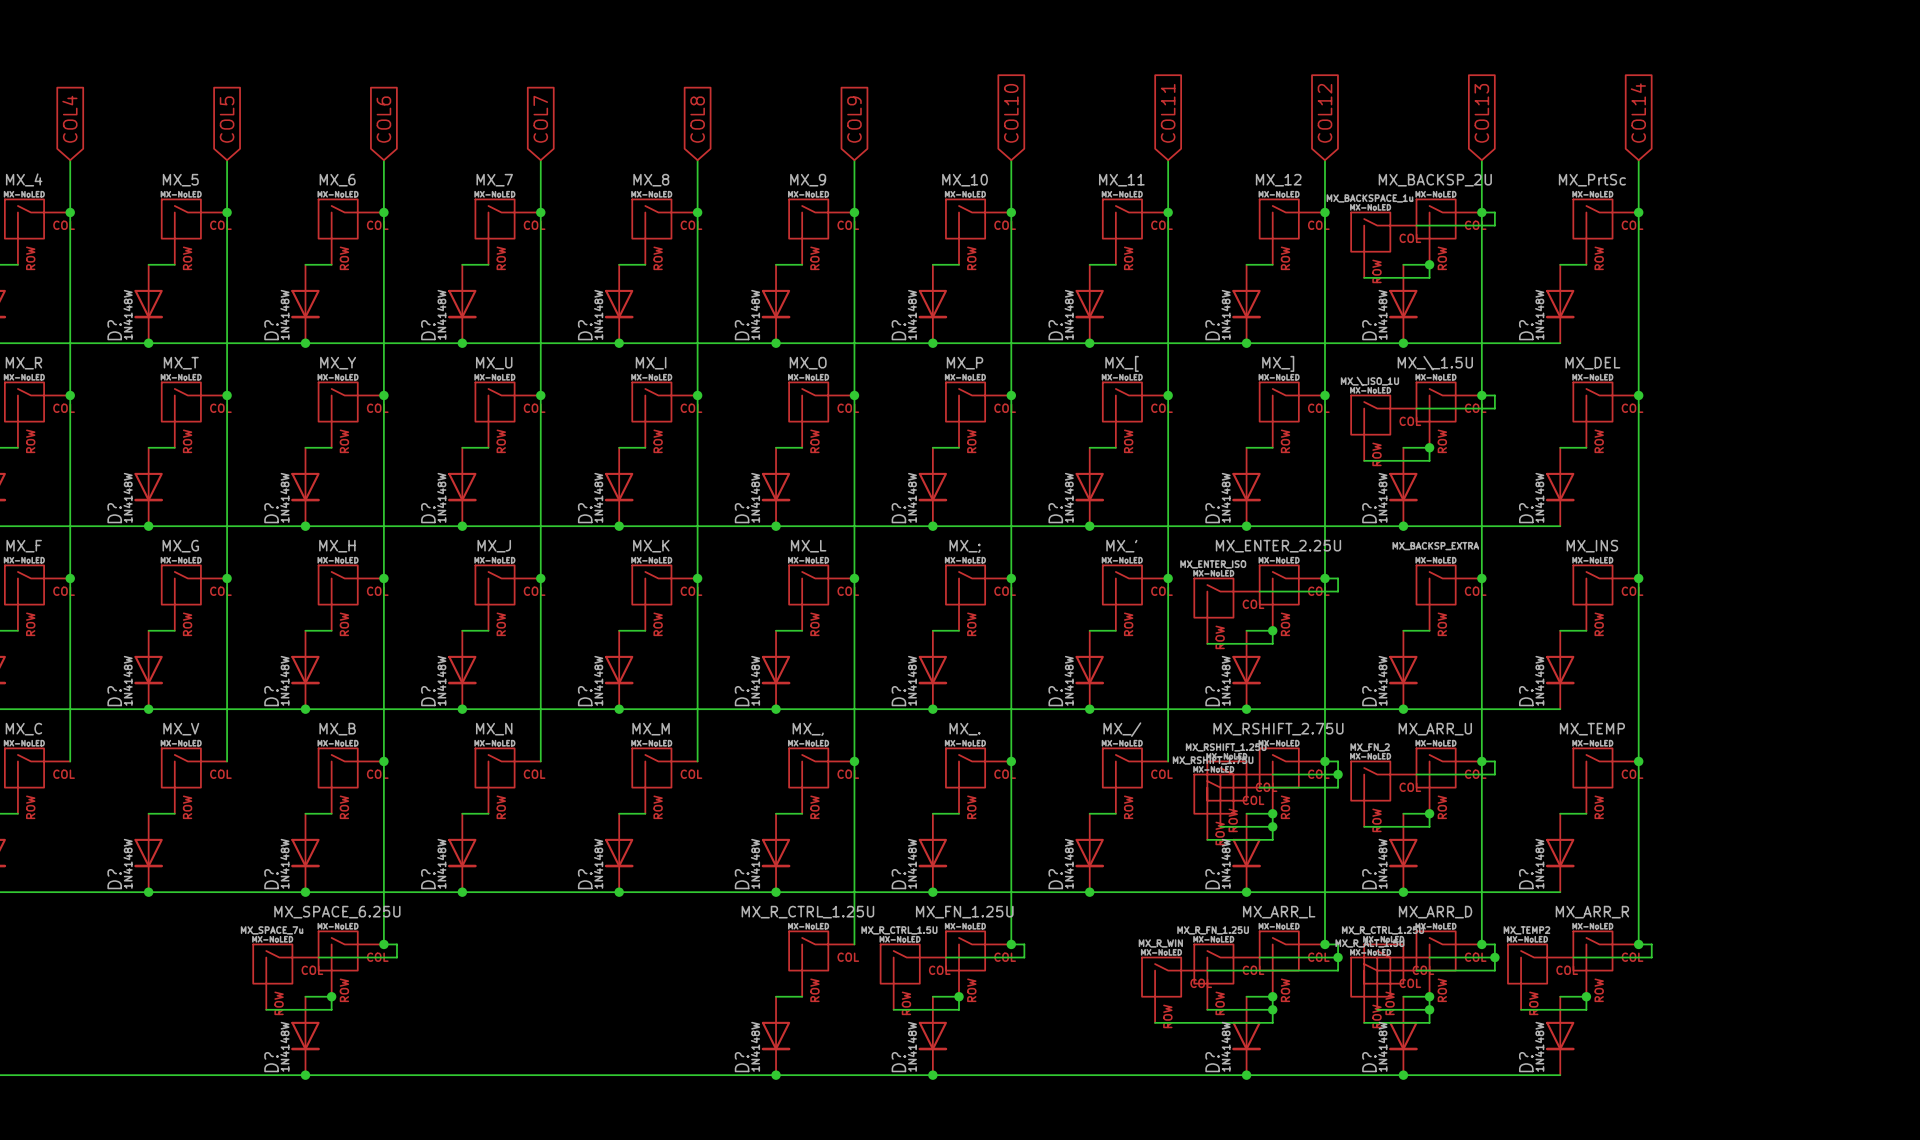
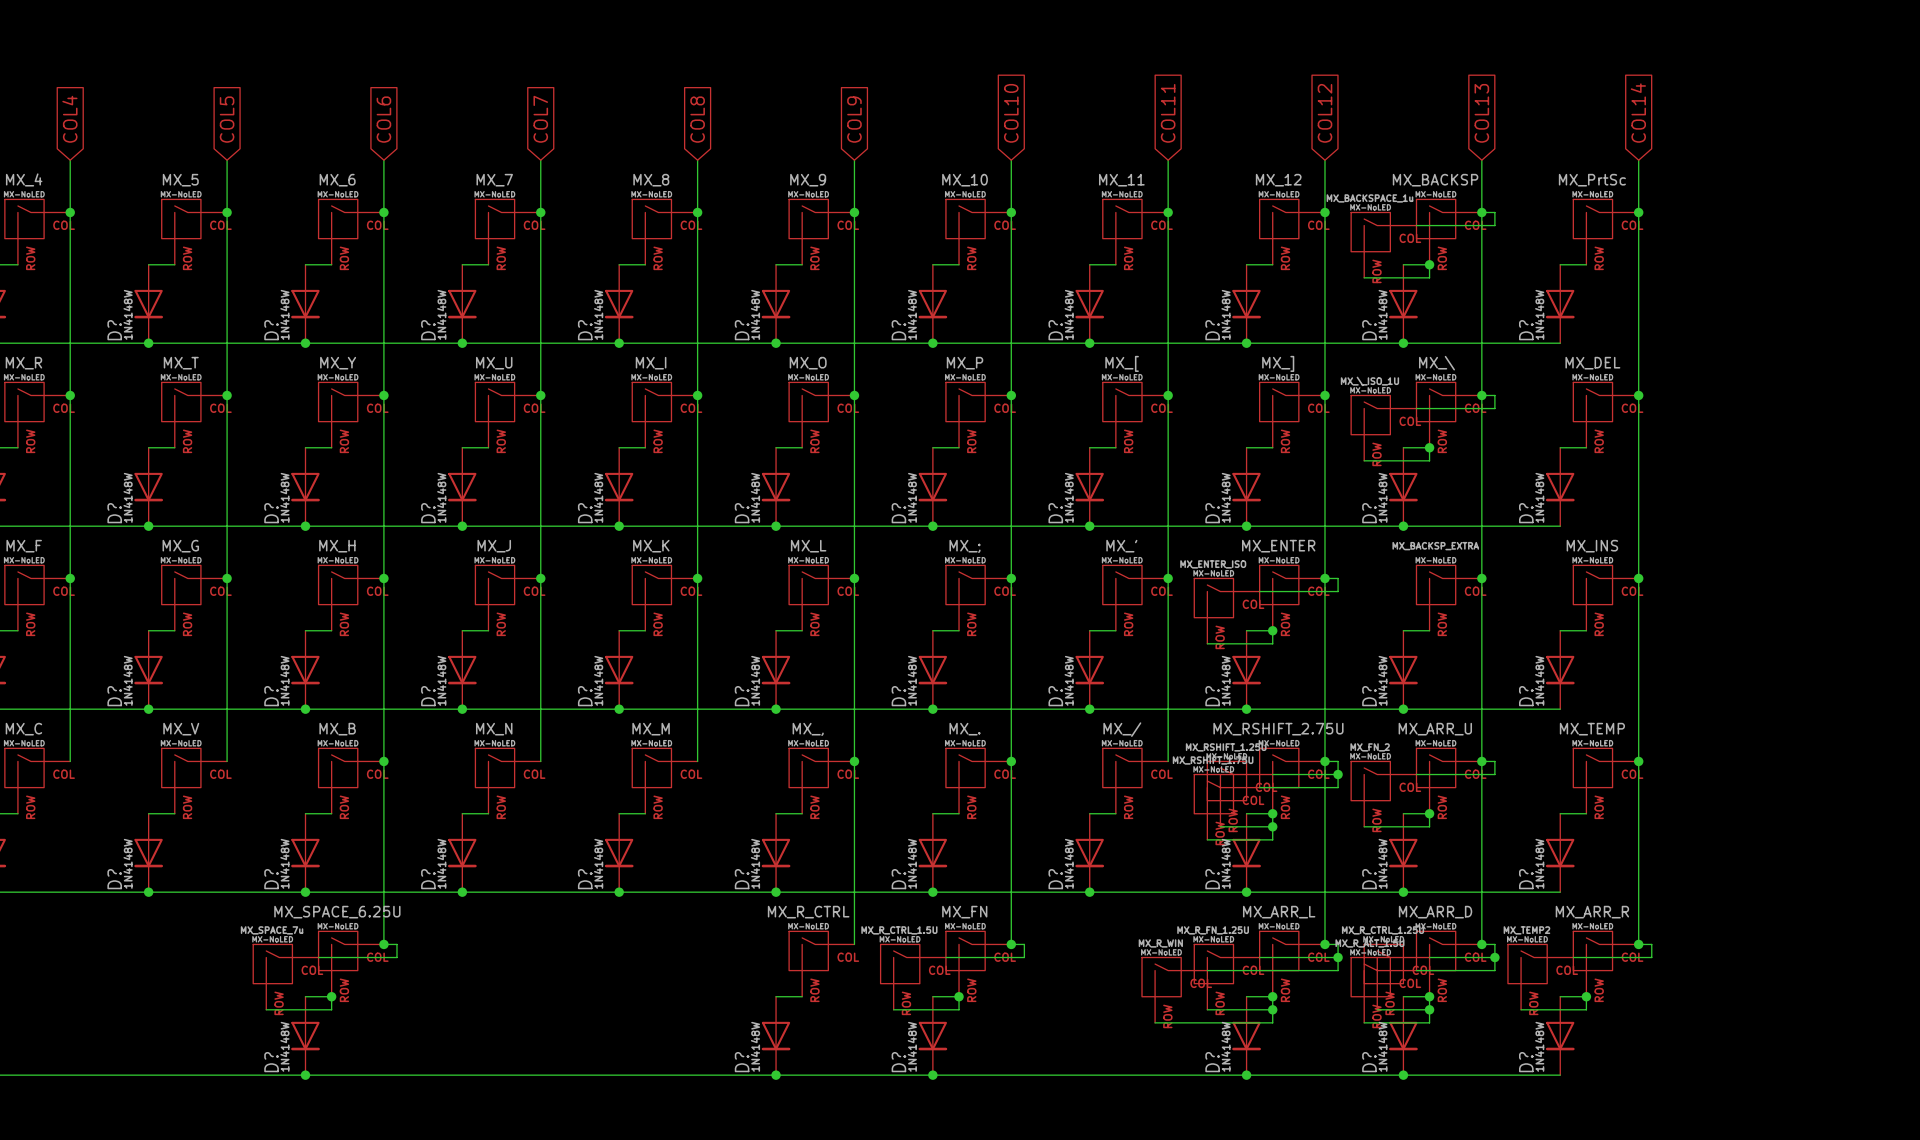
MX_BACKSP_2U name: MX_BACKSP_2U (1435, 180) -> MX_BACKSP (1435, 180)
MX_\_1.5U name: MX_\_1.5U (1435, 363) -> MX_\ (1437, 363)
MX_ENTER_2.25U name: MX_ENTER_2.25U (1278, 546) -> MX_ENTER (1278, 546)
MX_R_CTRL_1.25U name: MX_R_CTRL_1.25U (807, 912) -> MX_R_CTRL (808, 912)
MX_FN_1.25U name: MX_FN_1.25U (964, 912) -> MX_FN (964, 912)

